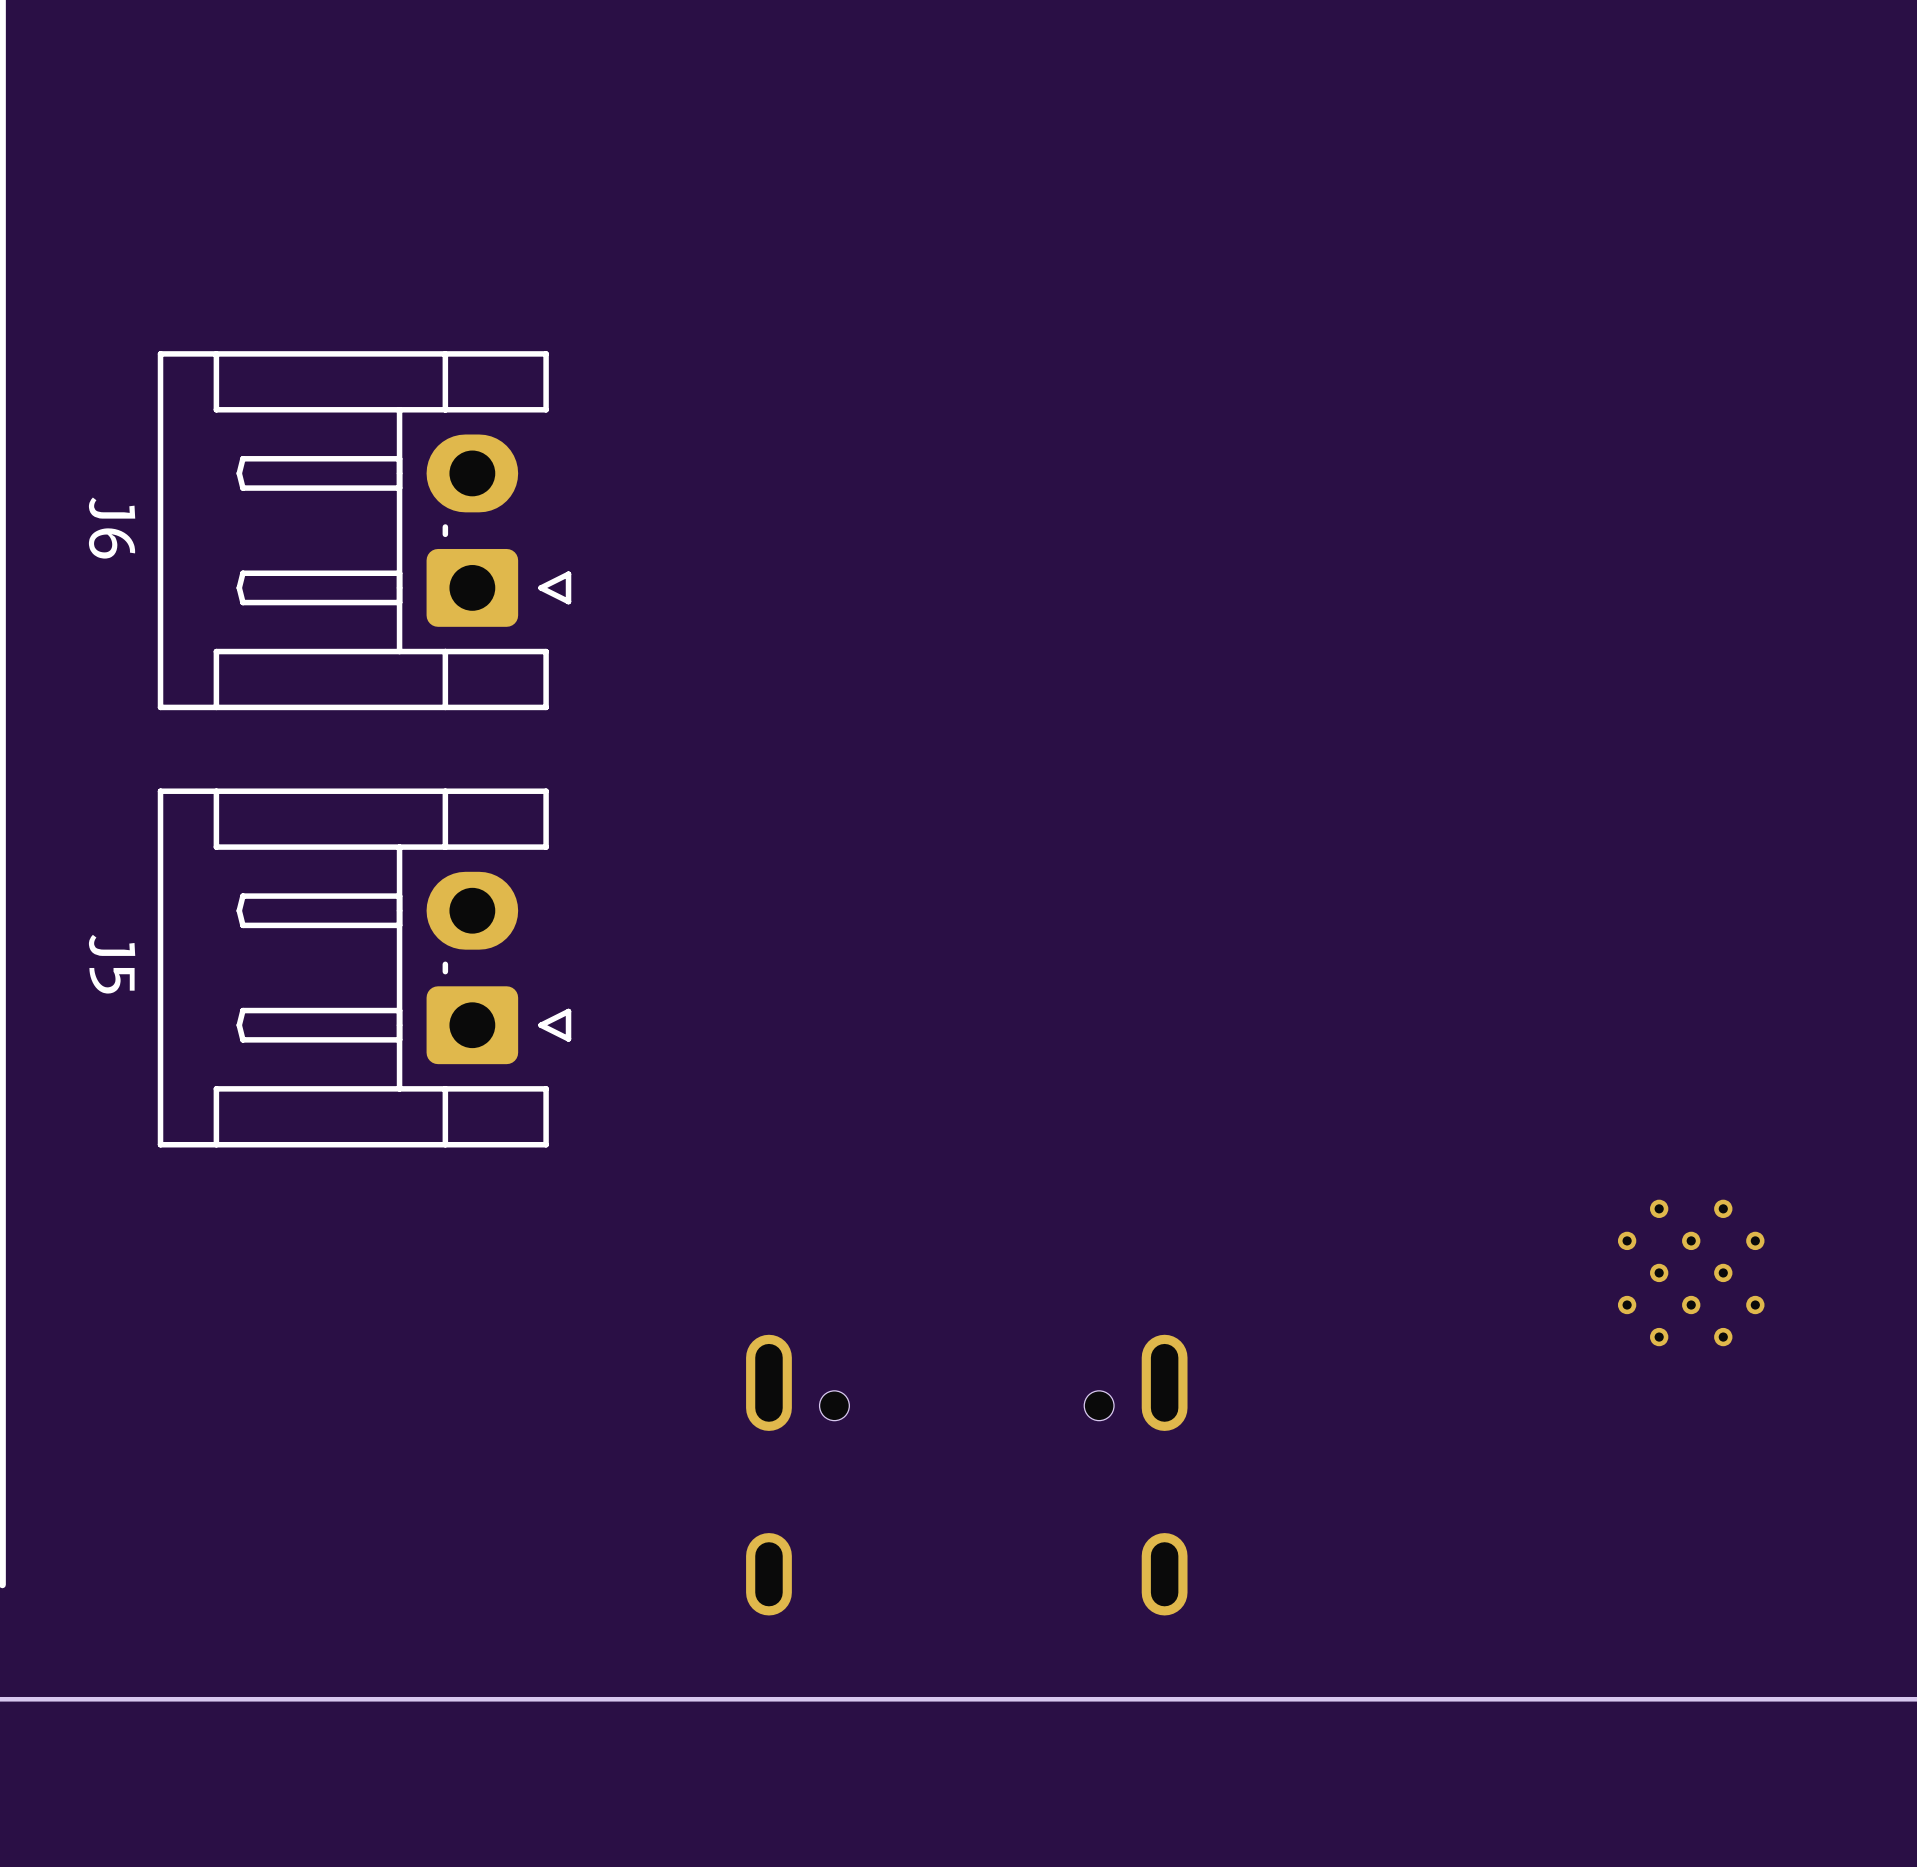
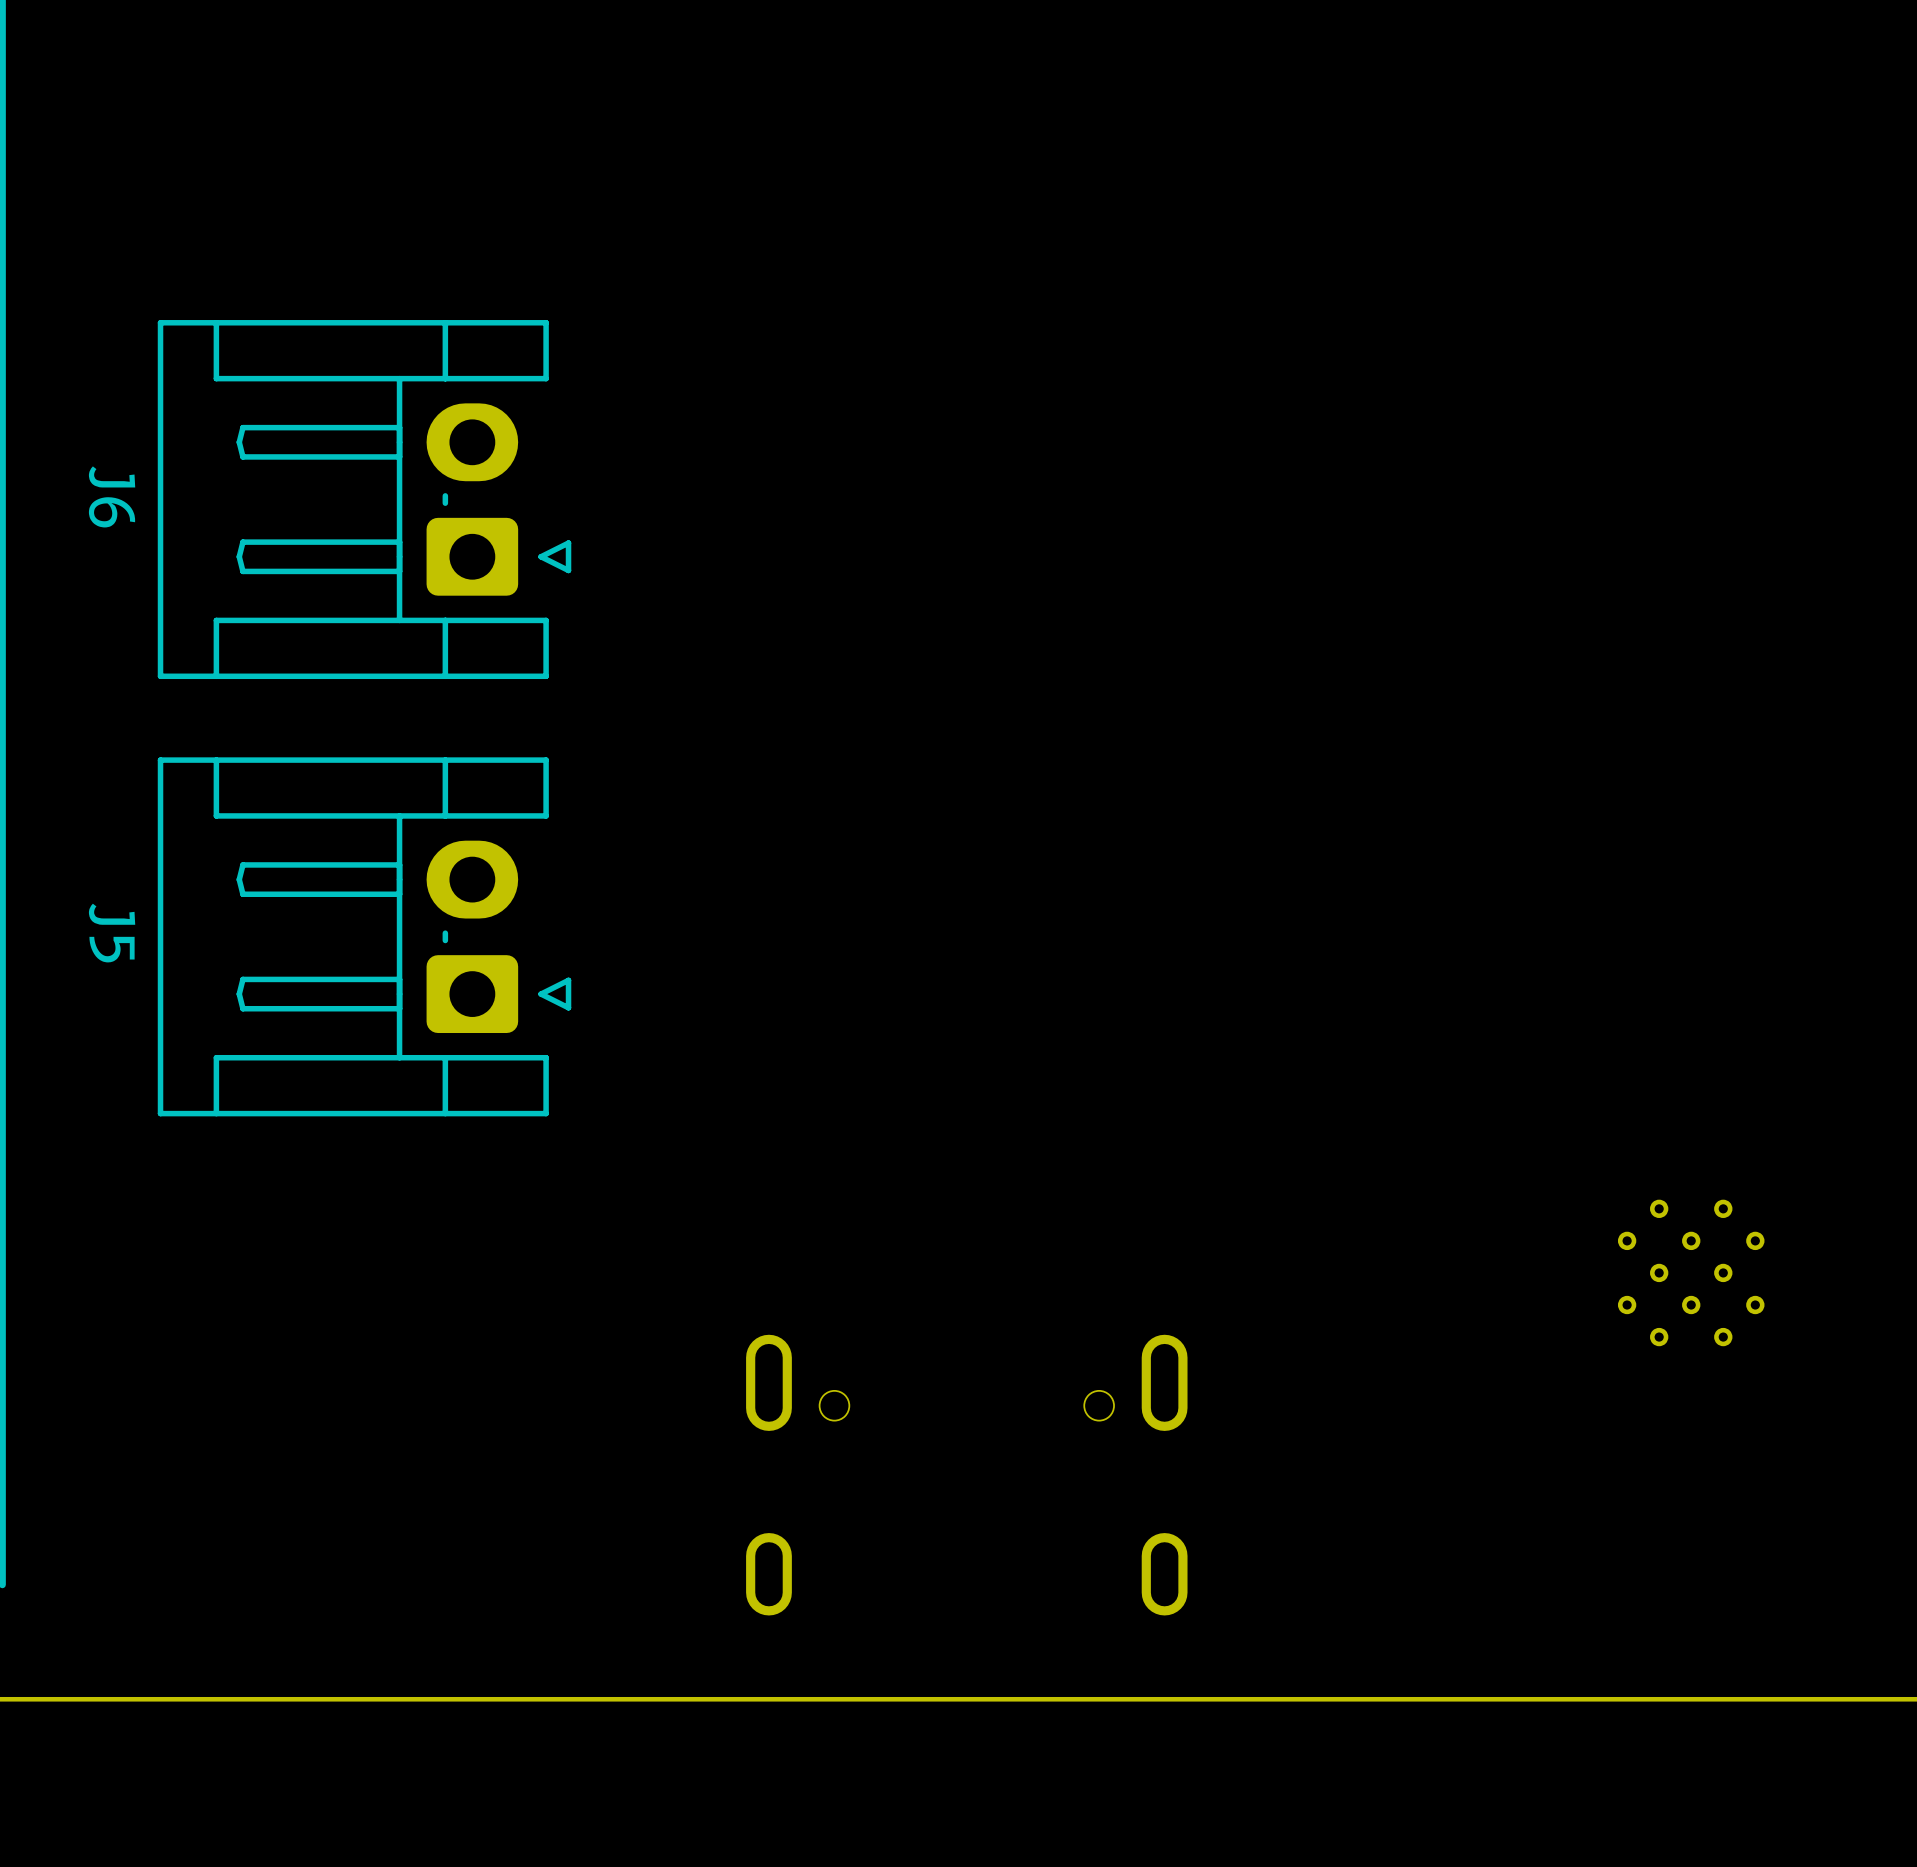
J6 position: (364, 530) -> (364, 499)
J5 position: (364, 967) -> (364, 936)

